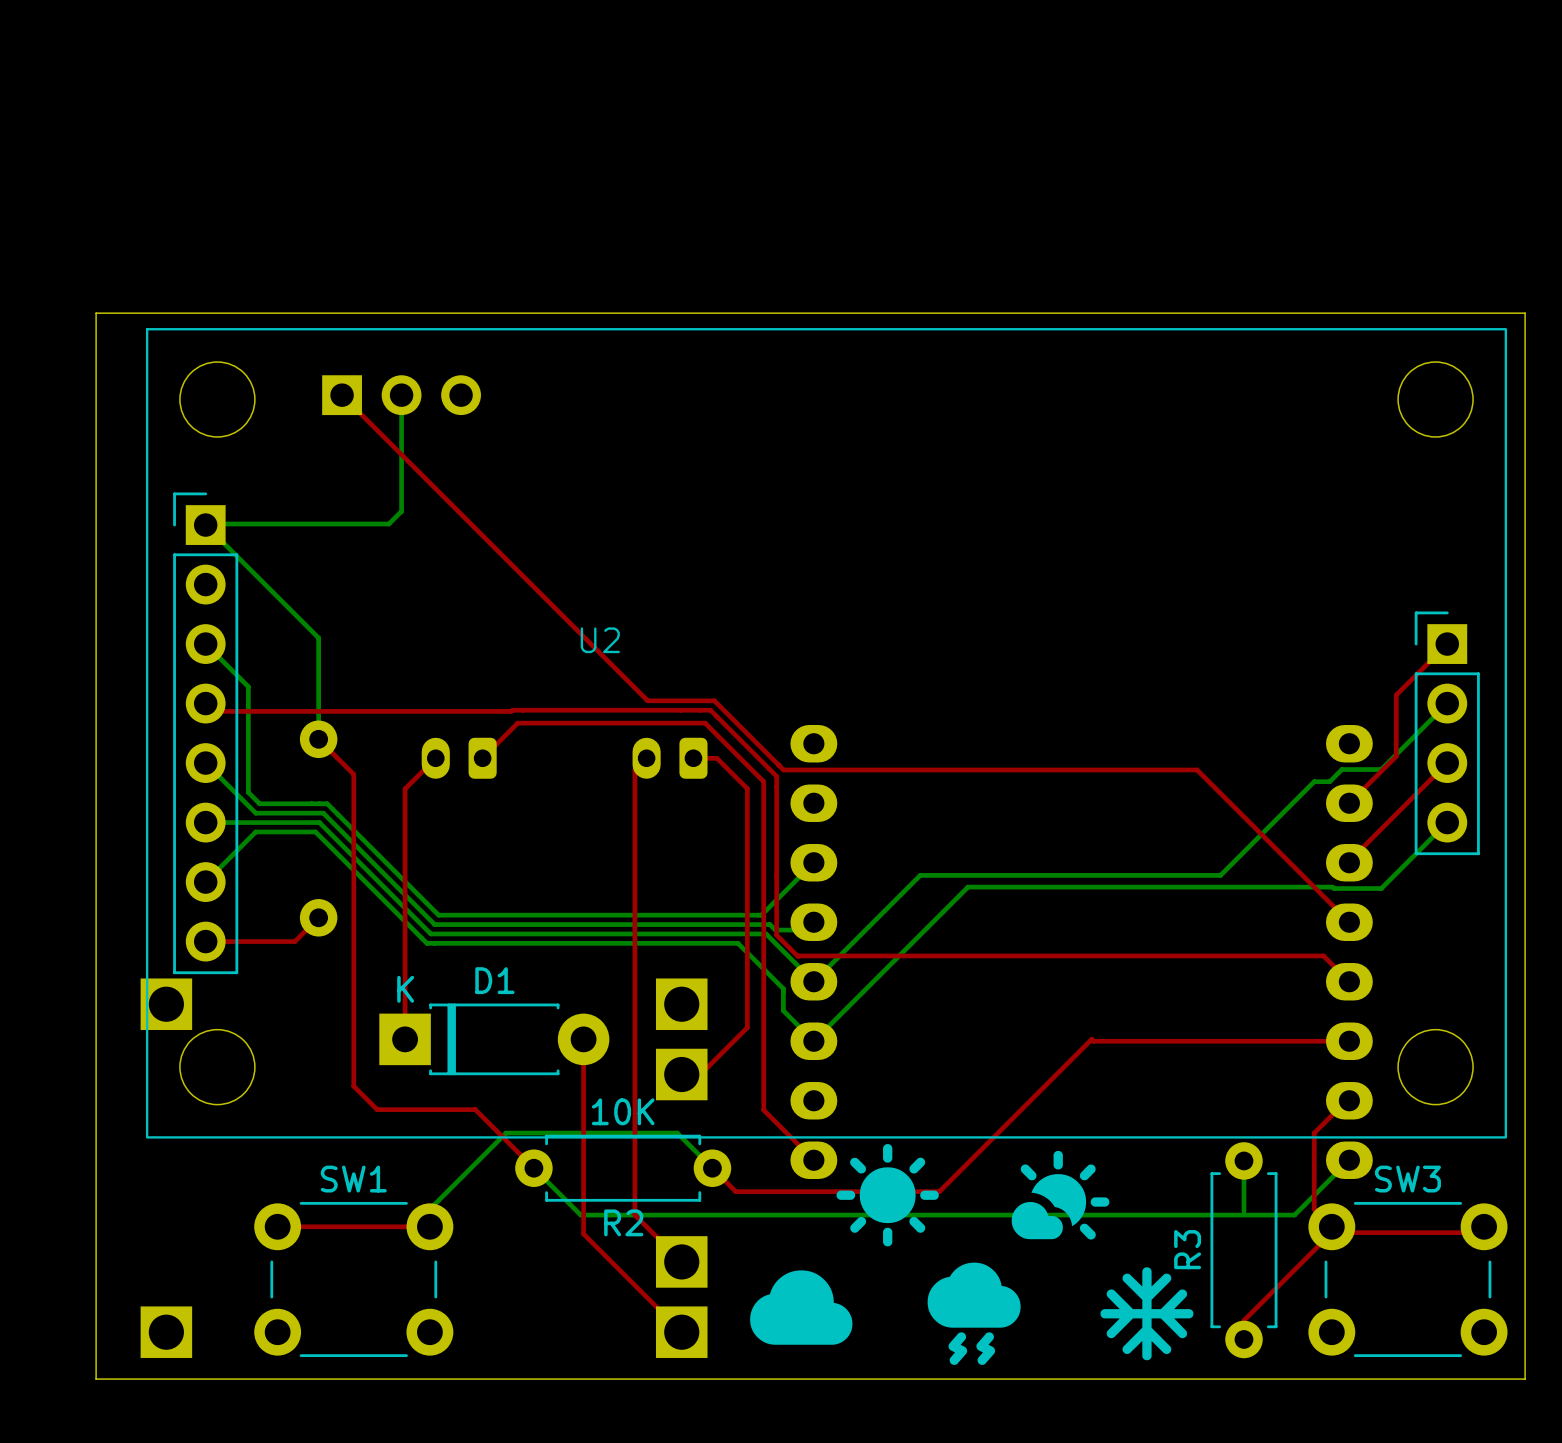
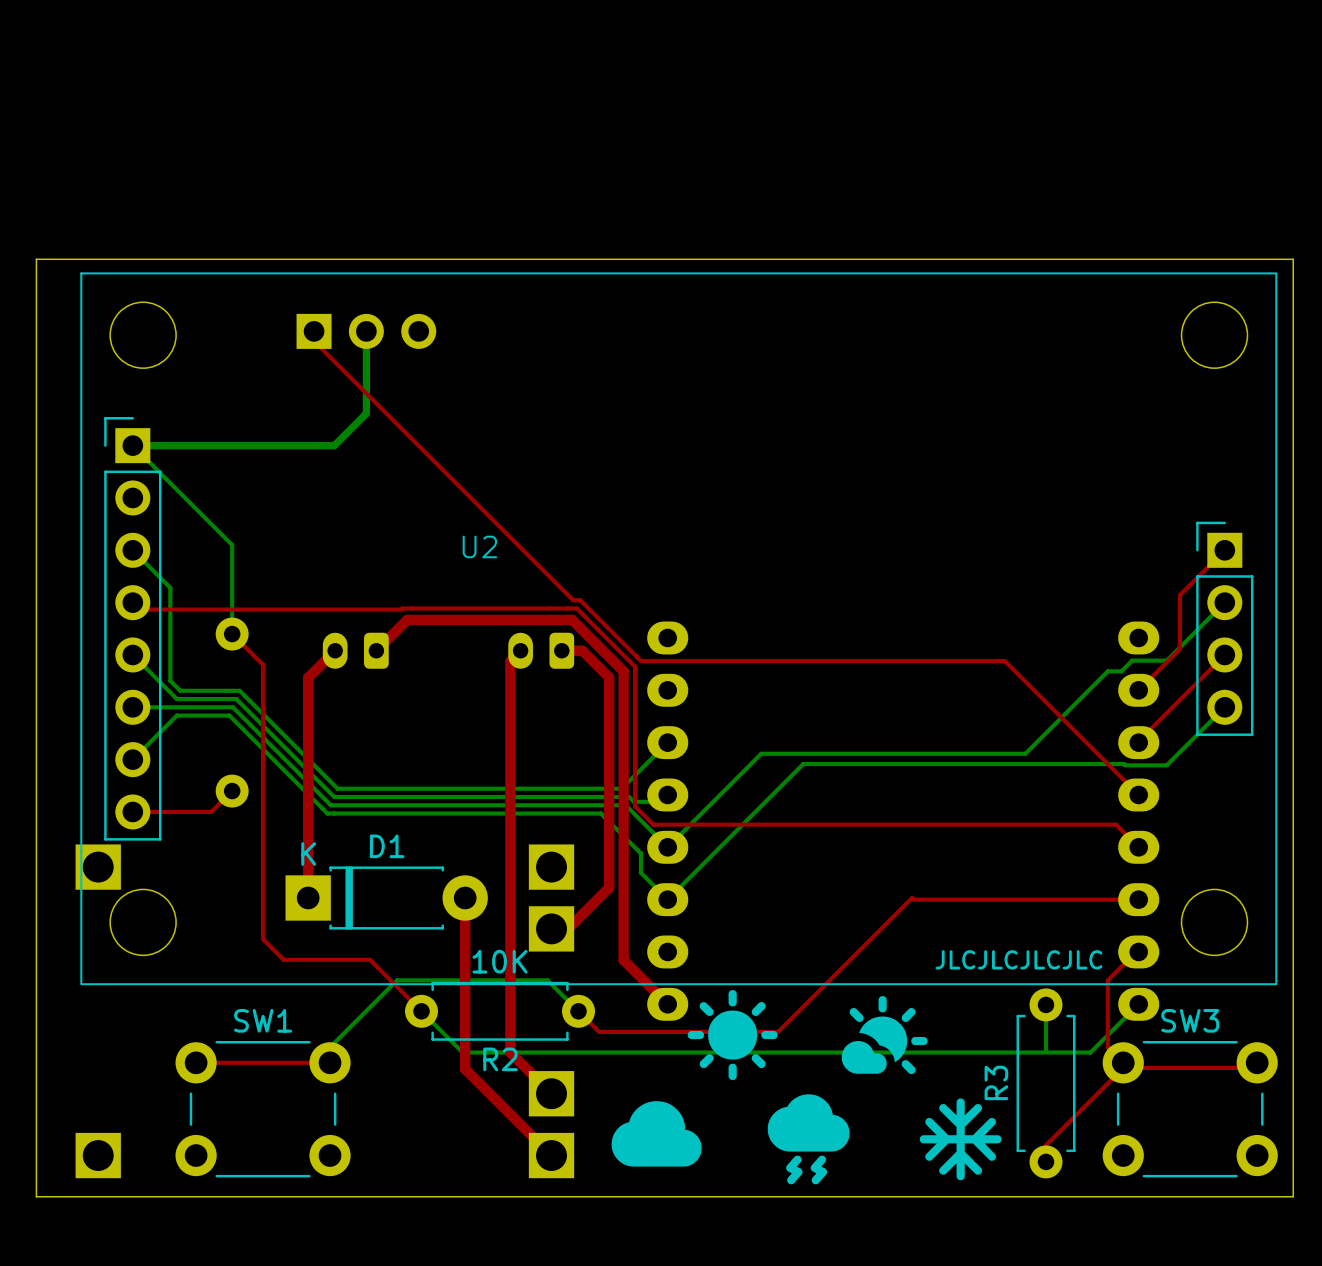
top track: (342, 395) (647, 700) (706, 700) -> (304, 331) (573, 600)
bottom track: (401, 395) (401, 511) (388, 524) (205, 525) -> (366, 331) (366, 413) (334, 445) (132, 445)
part position: (401, 395) -> (366, 331)
top track width: thin (435, 758) (405, 788) (405, 1039) -> thick (335, 650) (308, 677) (308, 897)
top track width: thin (482, 758) (517, 723) (705, 723) (763, 781) (763, 1110) (813, 1160) -> thick (376, 650) (407, 619) (572, 619) (623, 671) (623, 960) (667, 1004)
top track width: thin (693, 758) (716, 758) (747, 788) (747, 1027) (700, 1074) -> thick (561, 650) (582, 650) (609, 677) (609, 887) (567, 928)
top track width: thin (634, 769) (634, 1215) (681, 1261) -> thick (510, 661) (510, 1052) (551, 1093)
top track width: thin (583, 1039) (583, 1234) (681, 1332) -> thick (465, 897) (465, 1069) (551, 1155)
text: none -> JLCJLCJLCJLC (1018, 959)

